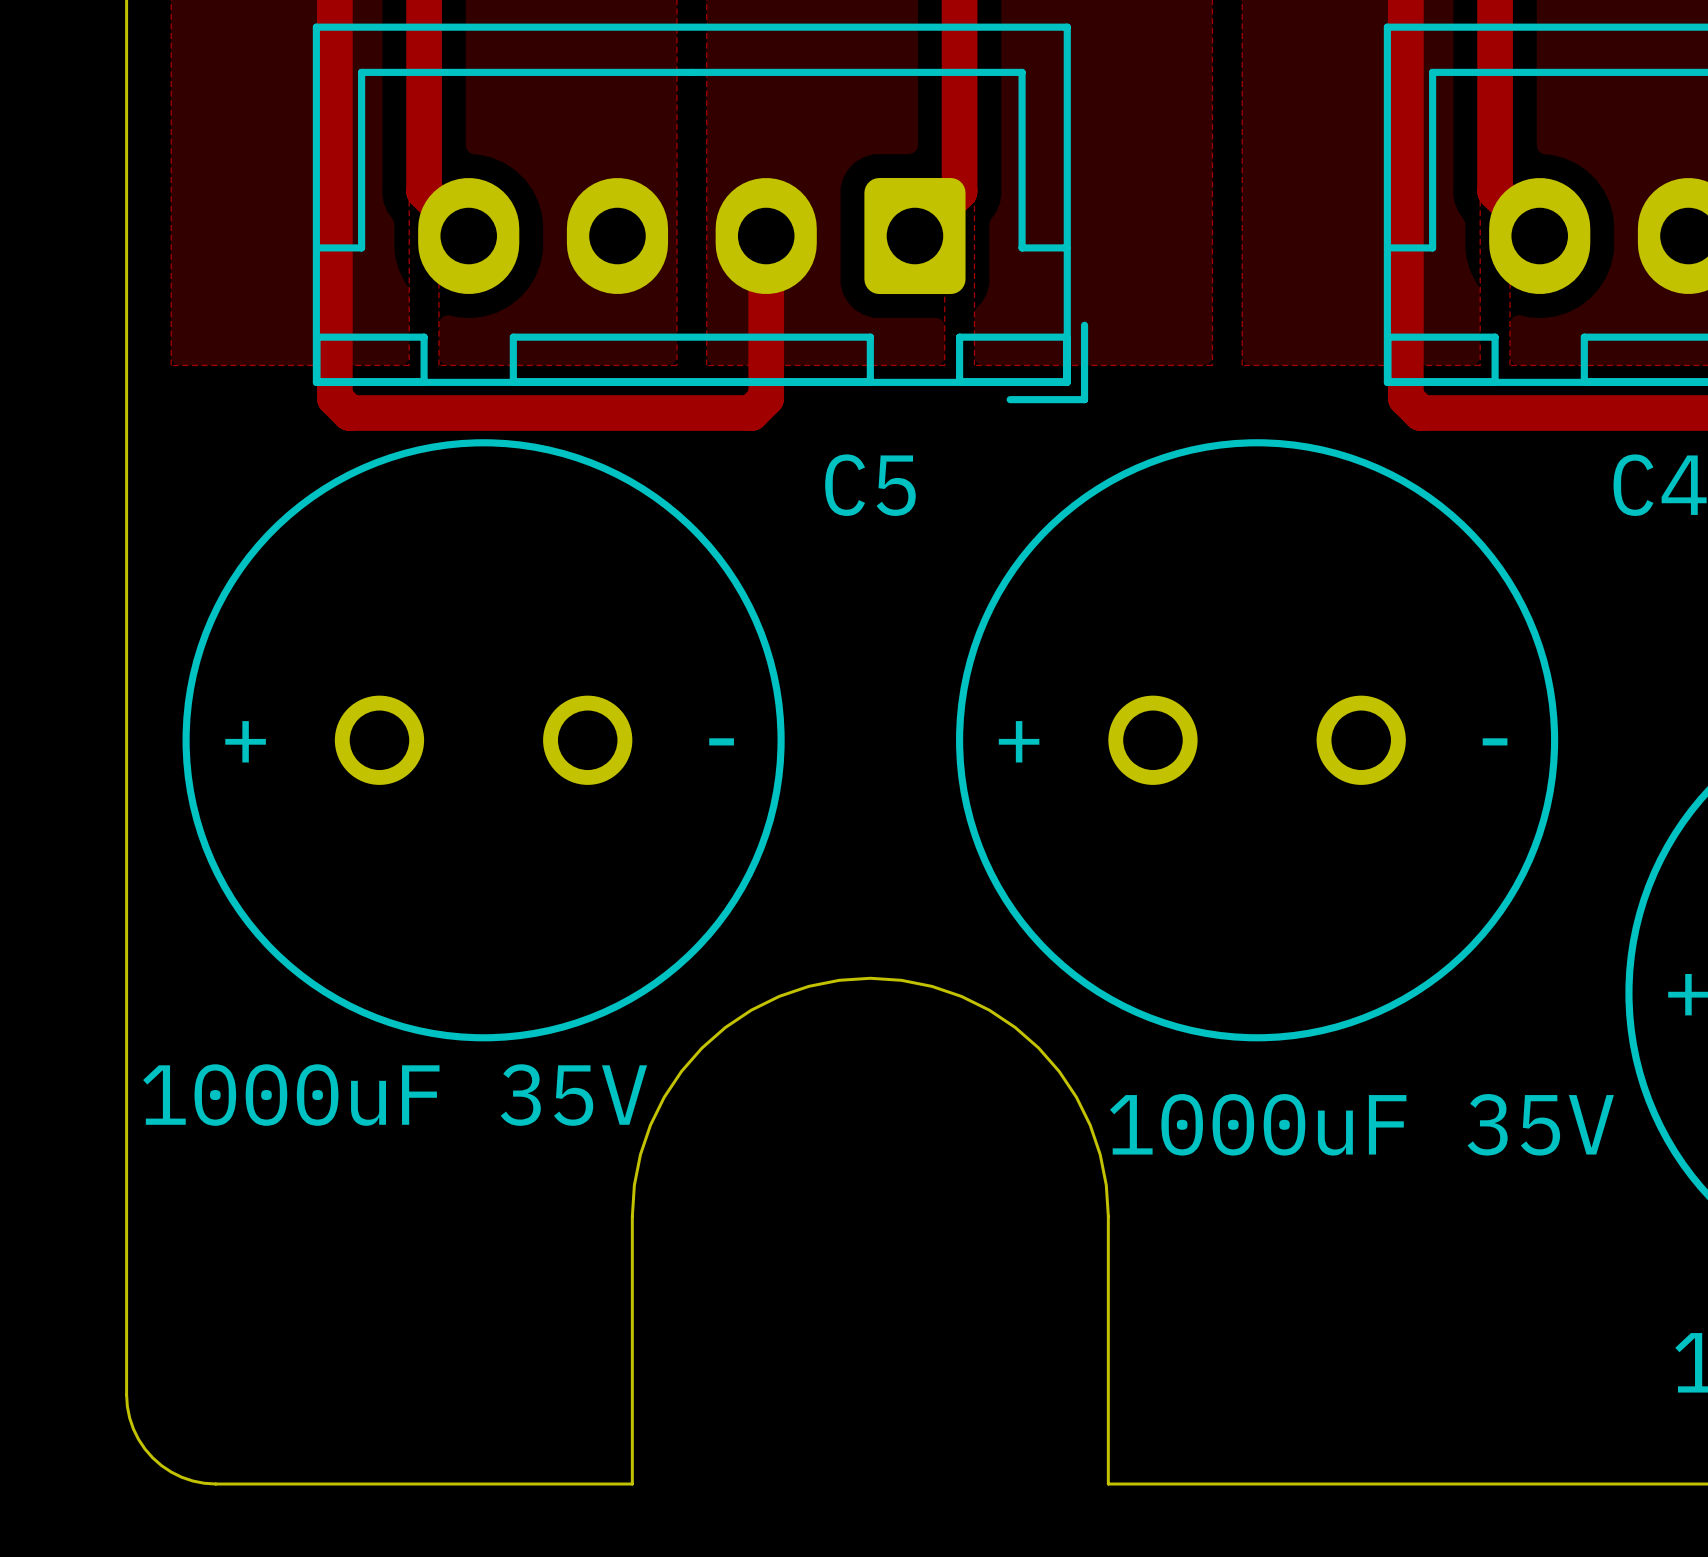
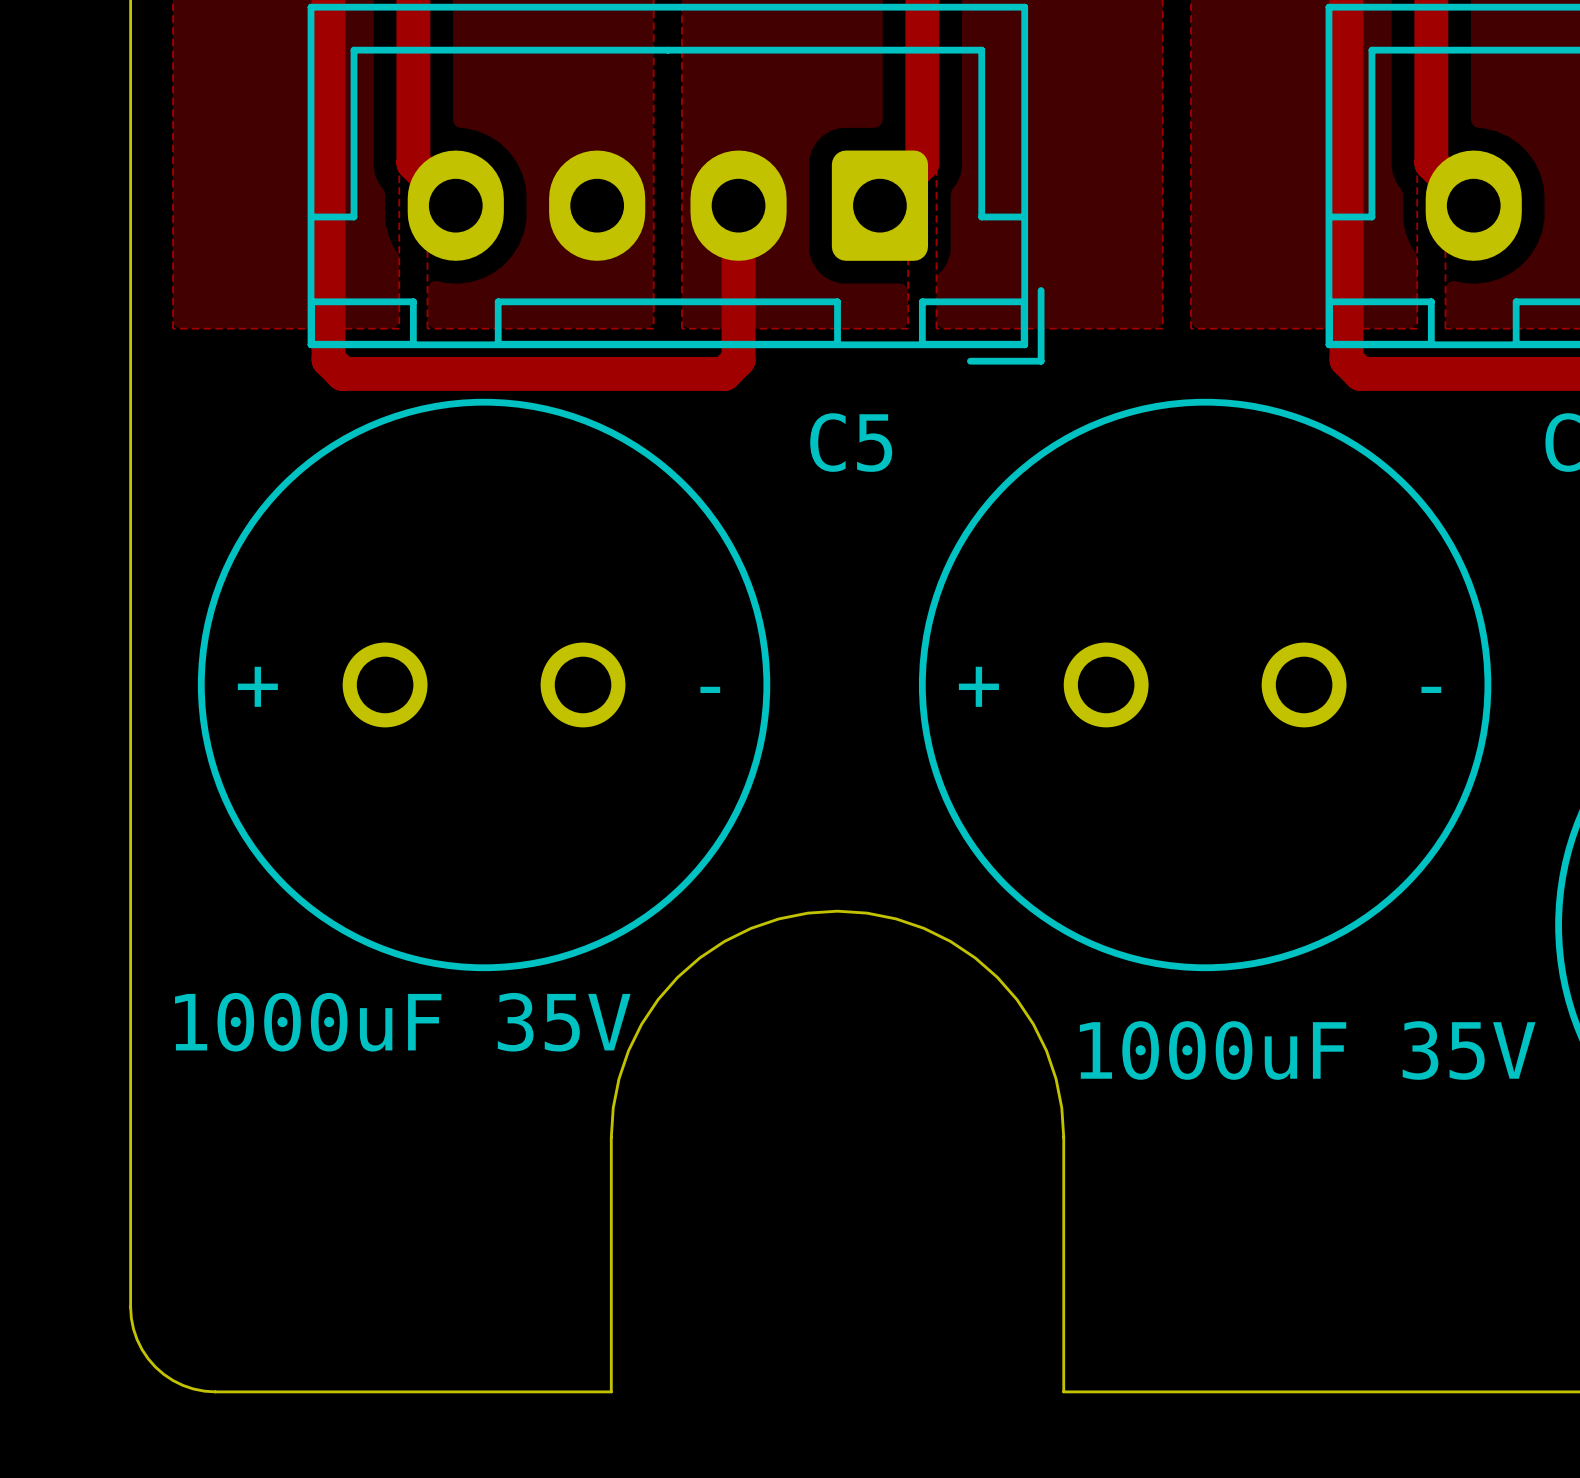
C5 position: (483, 740) -> (484, 684)

